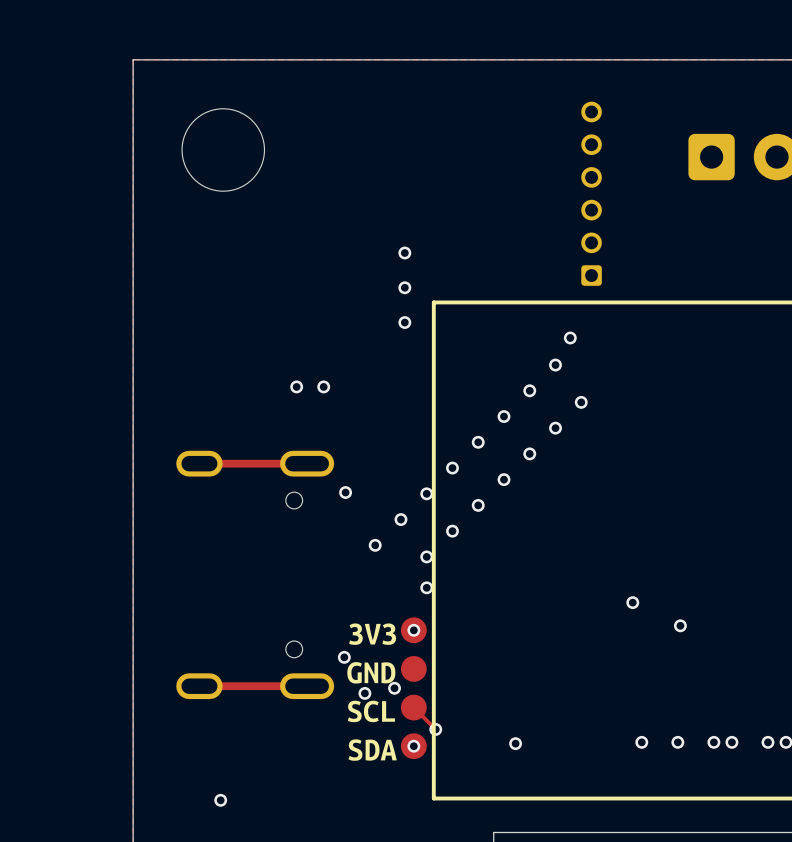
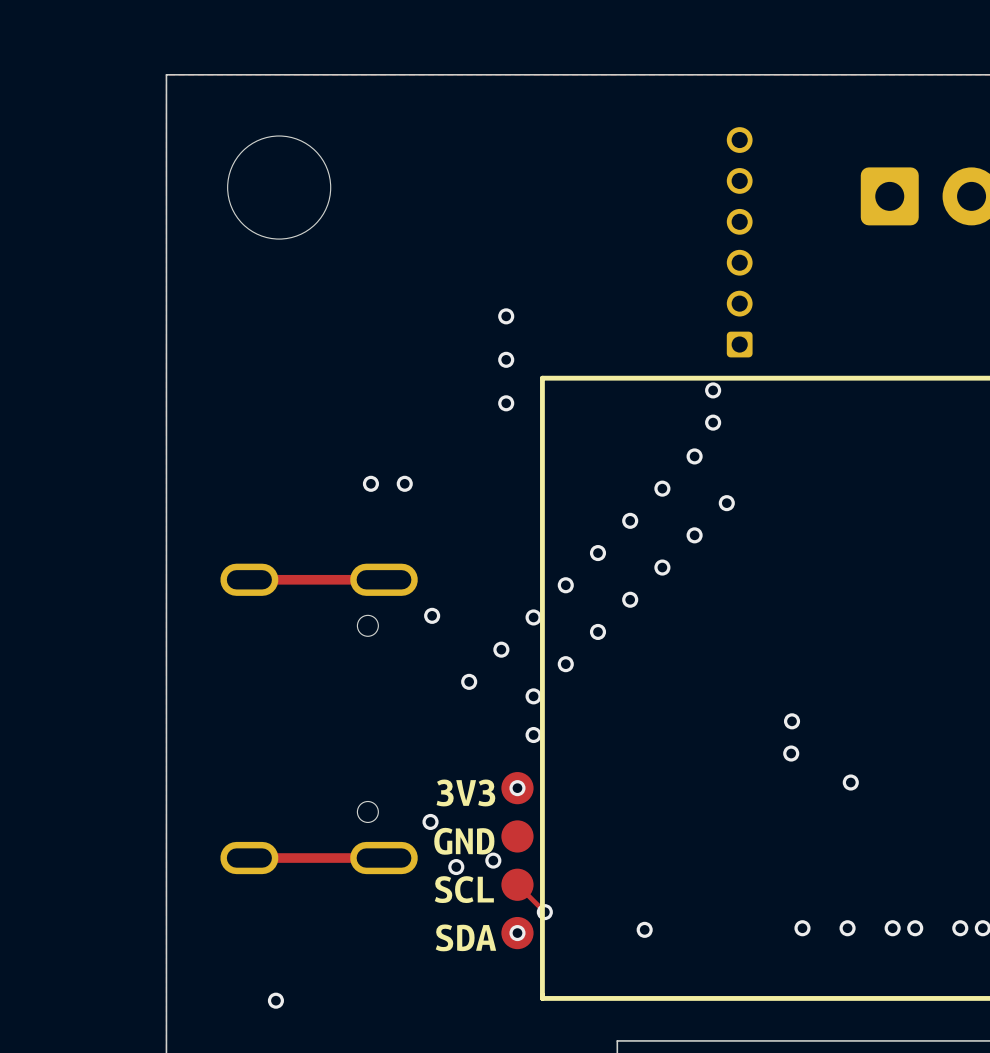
via: none -> (713, 390)
via: none -> (792, 721)

